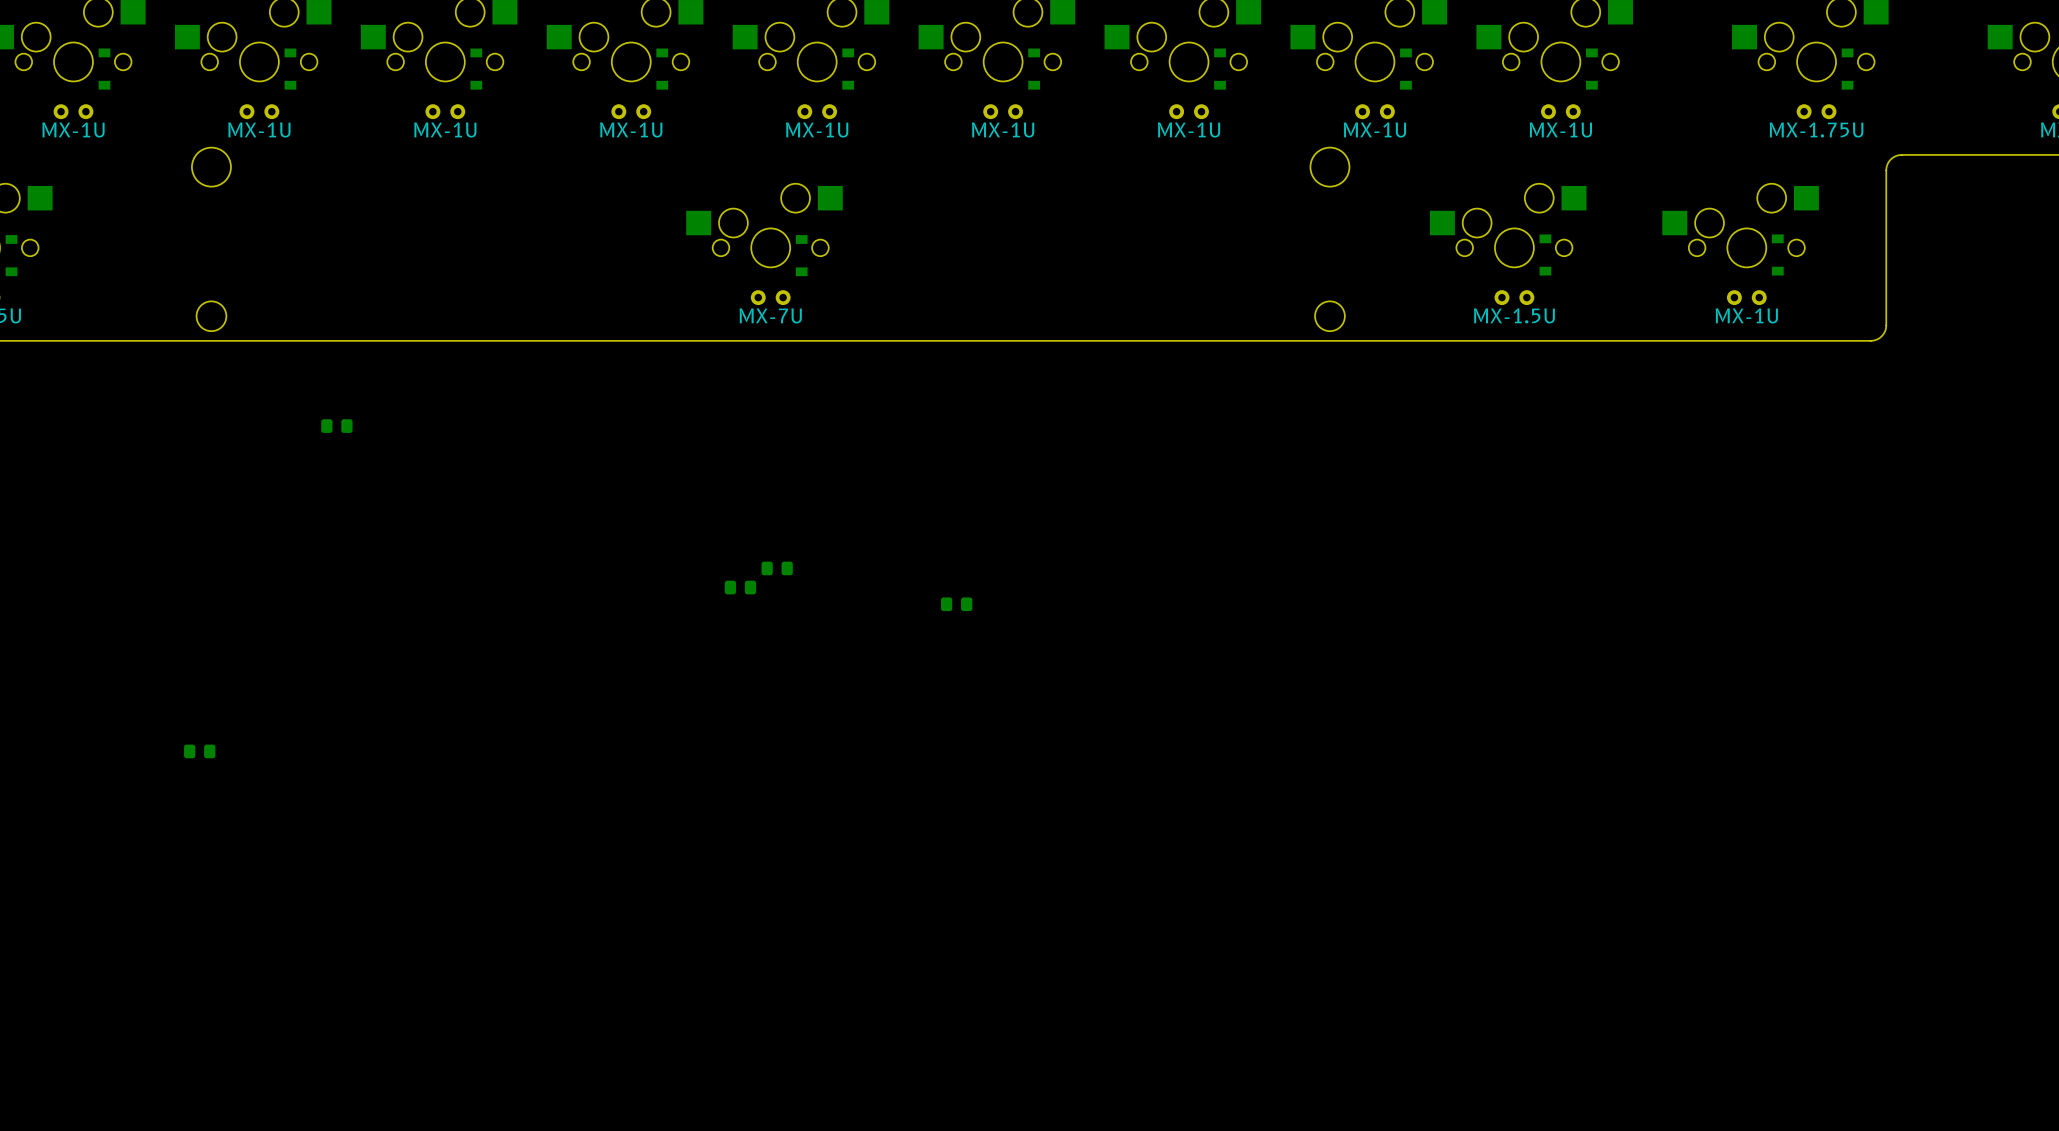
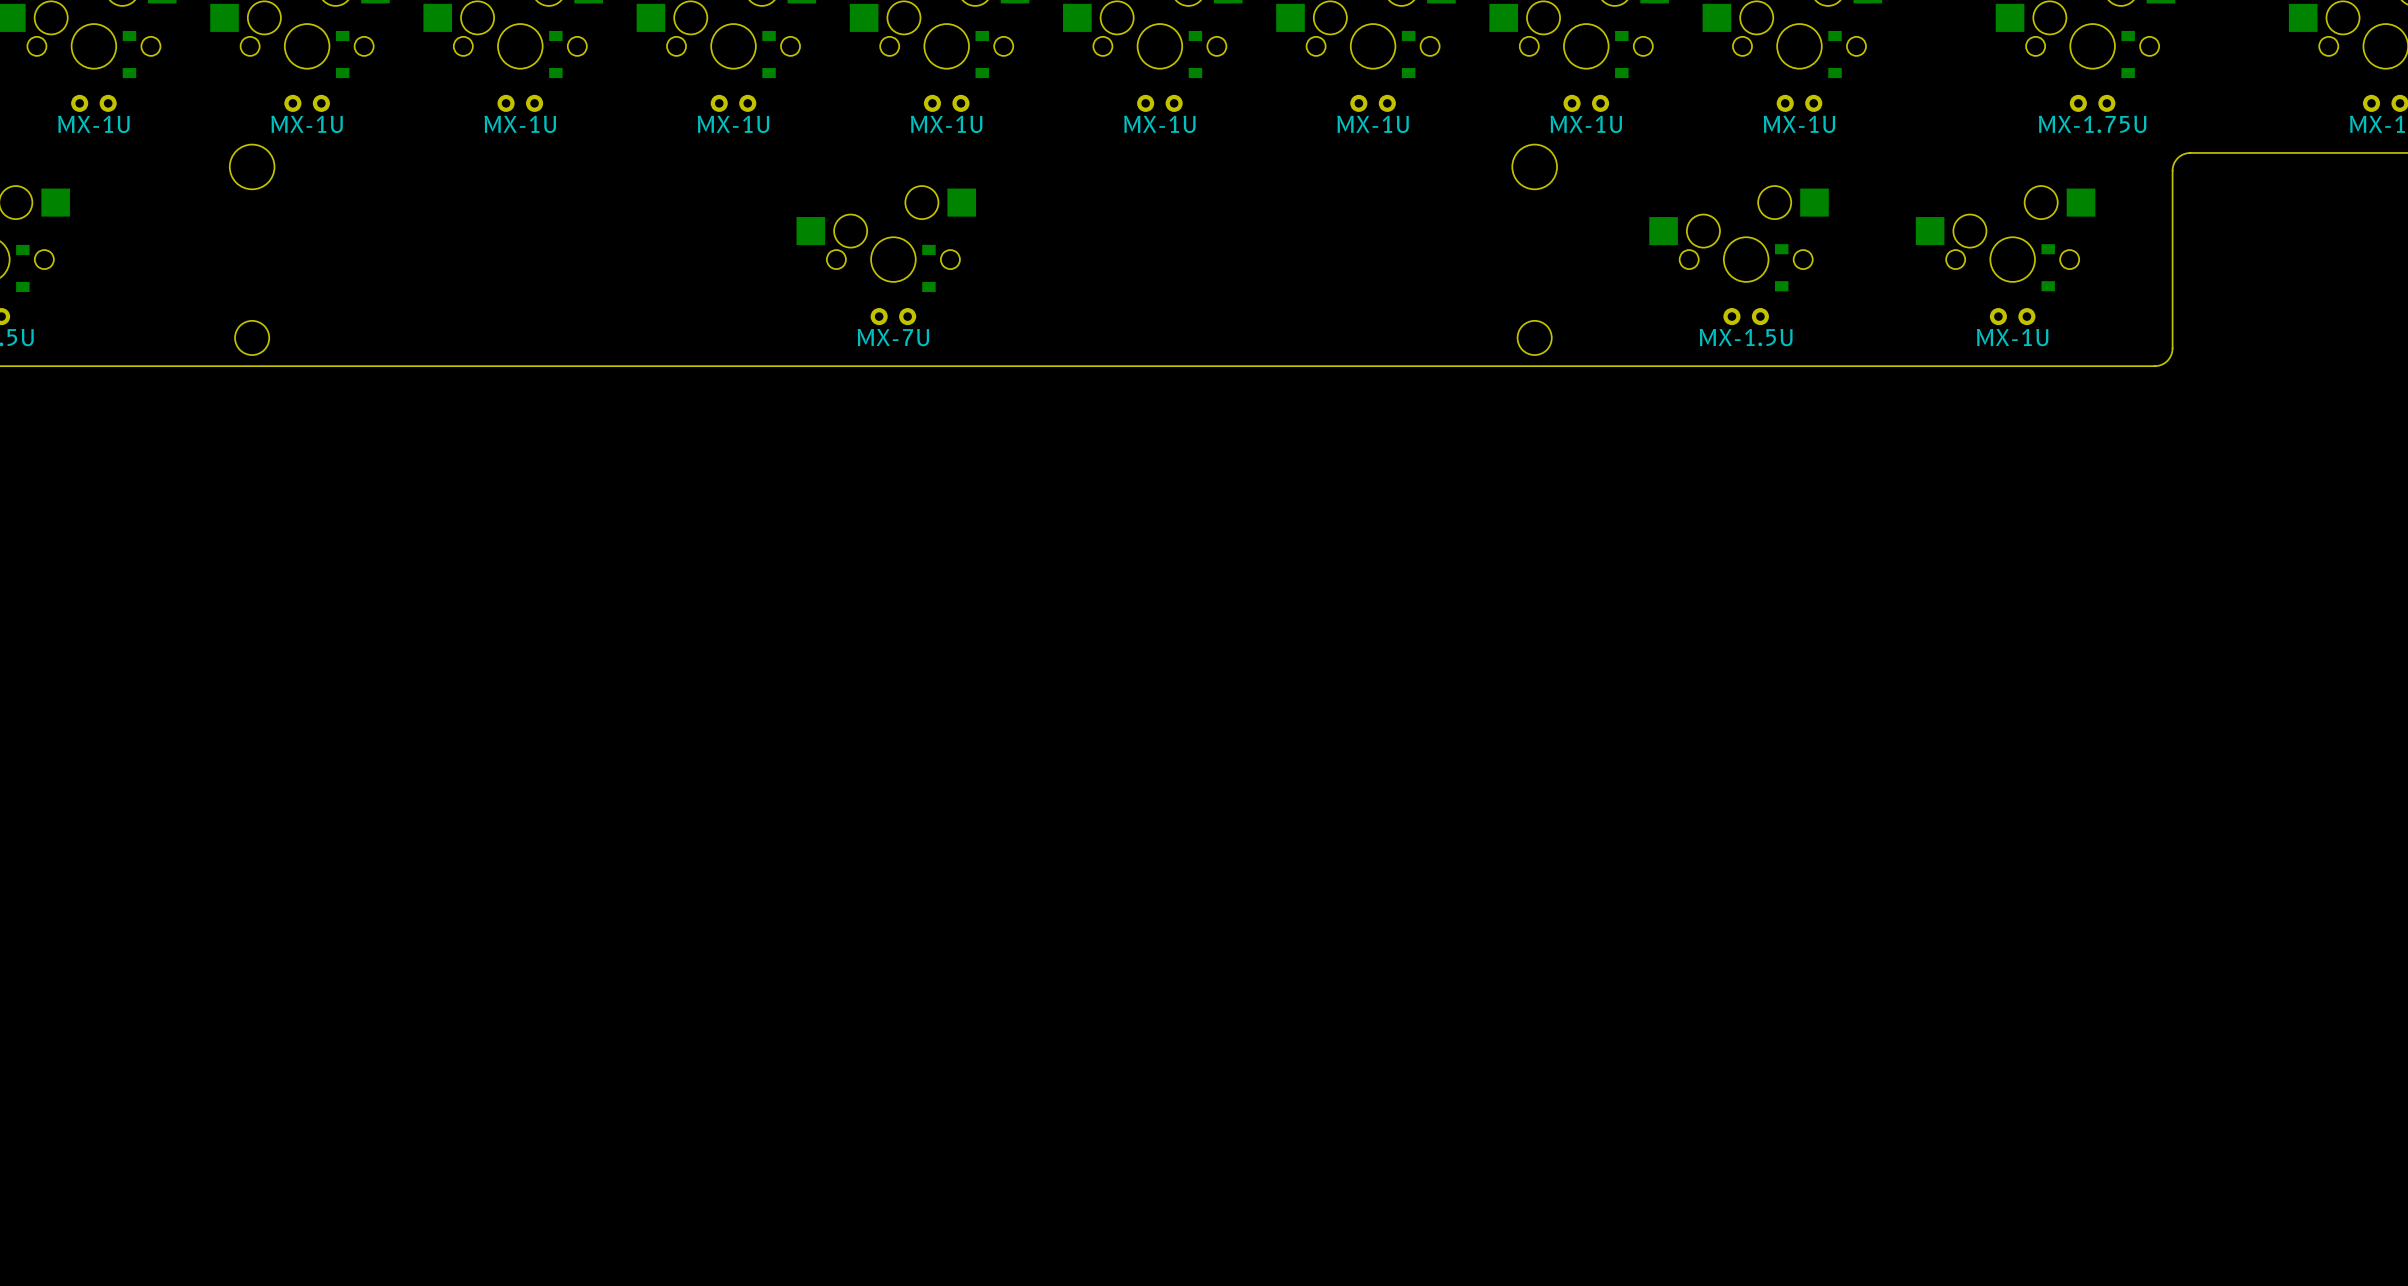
part: (336, 426) -> none
part: (777, 568) -> none
part: (740, 587) -> none
part: (956, 604) -> none
part: (199, 751) -> none

